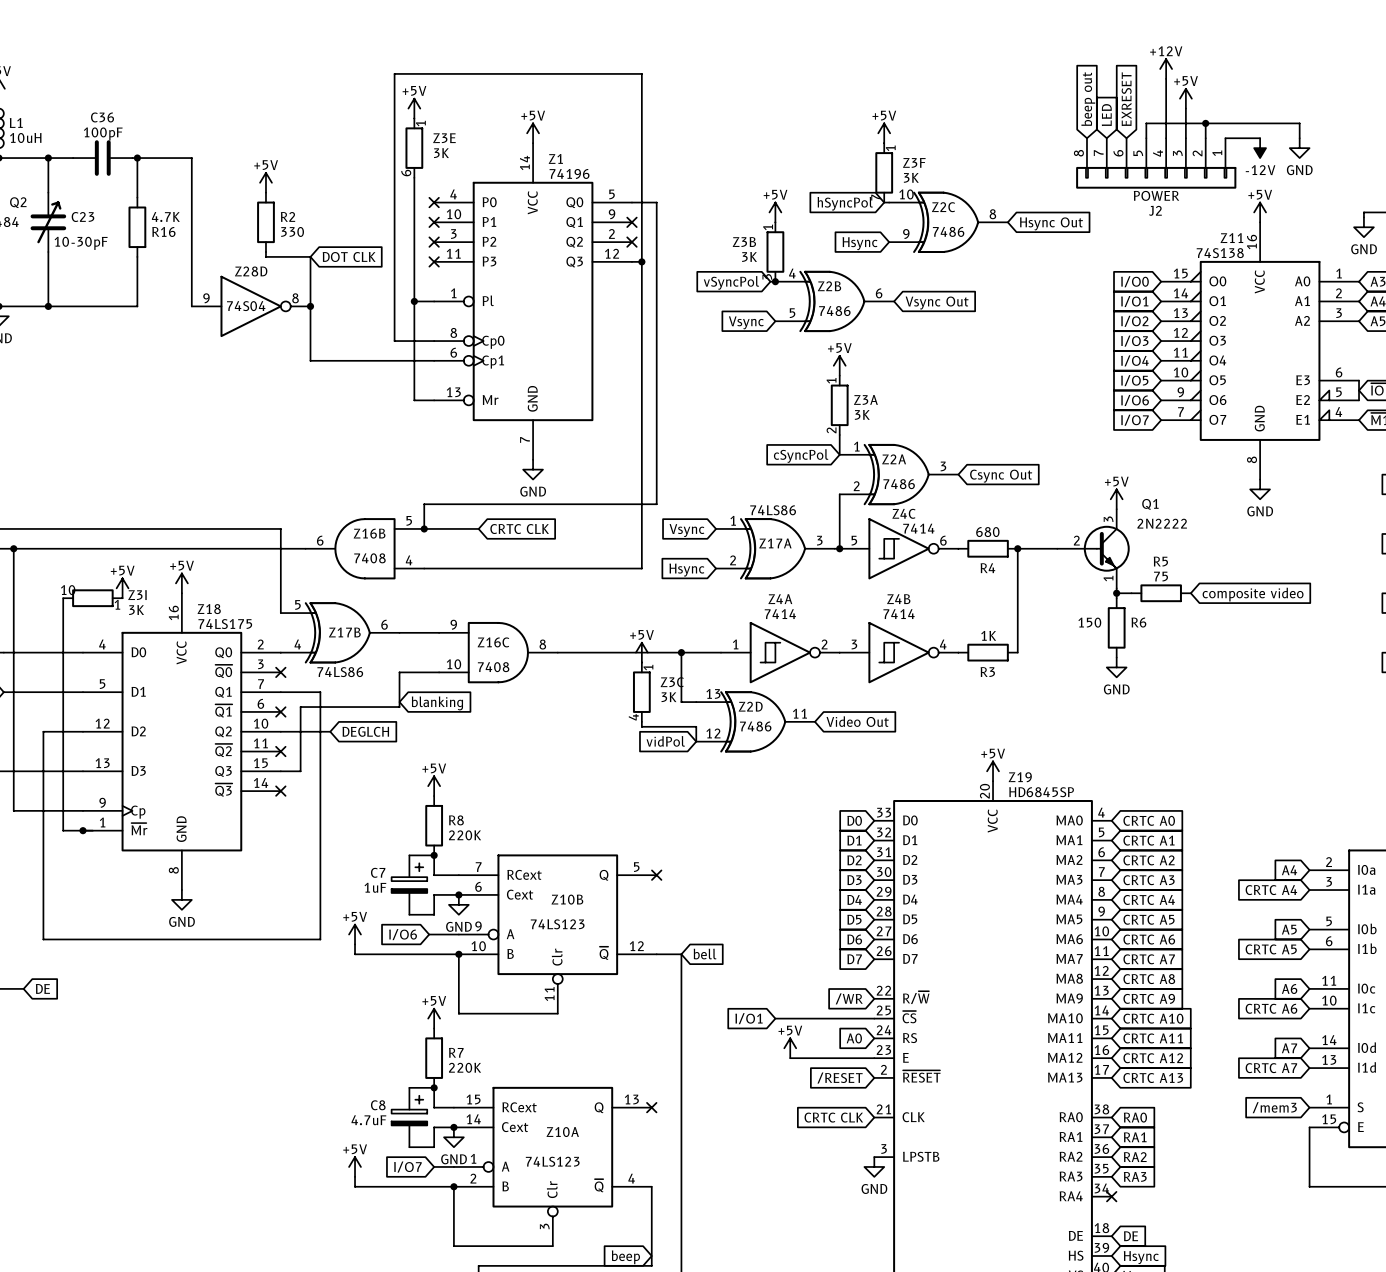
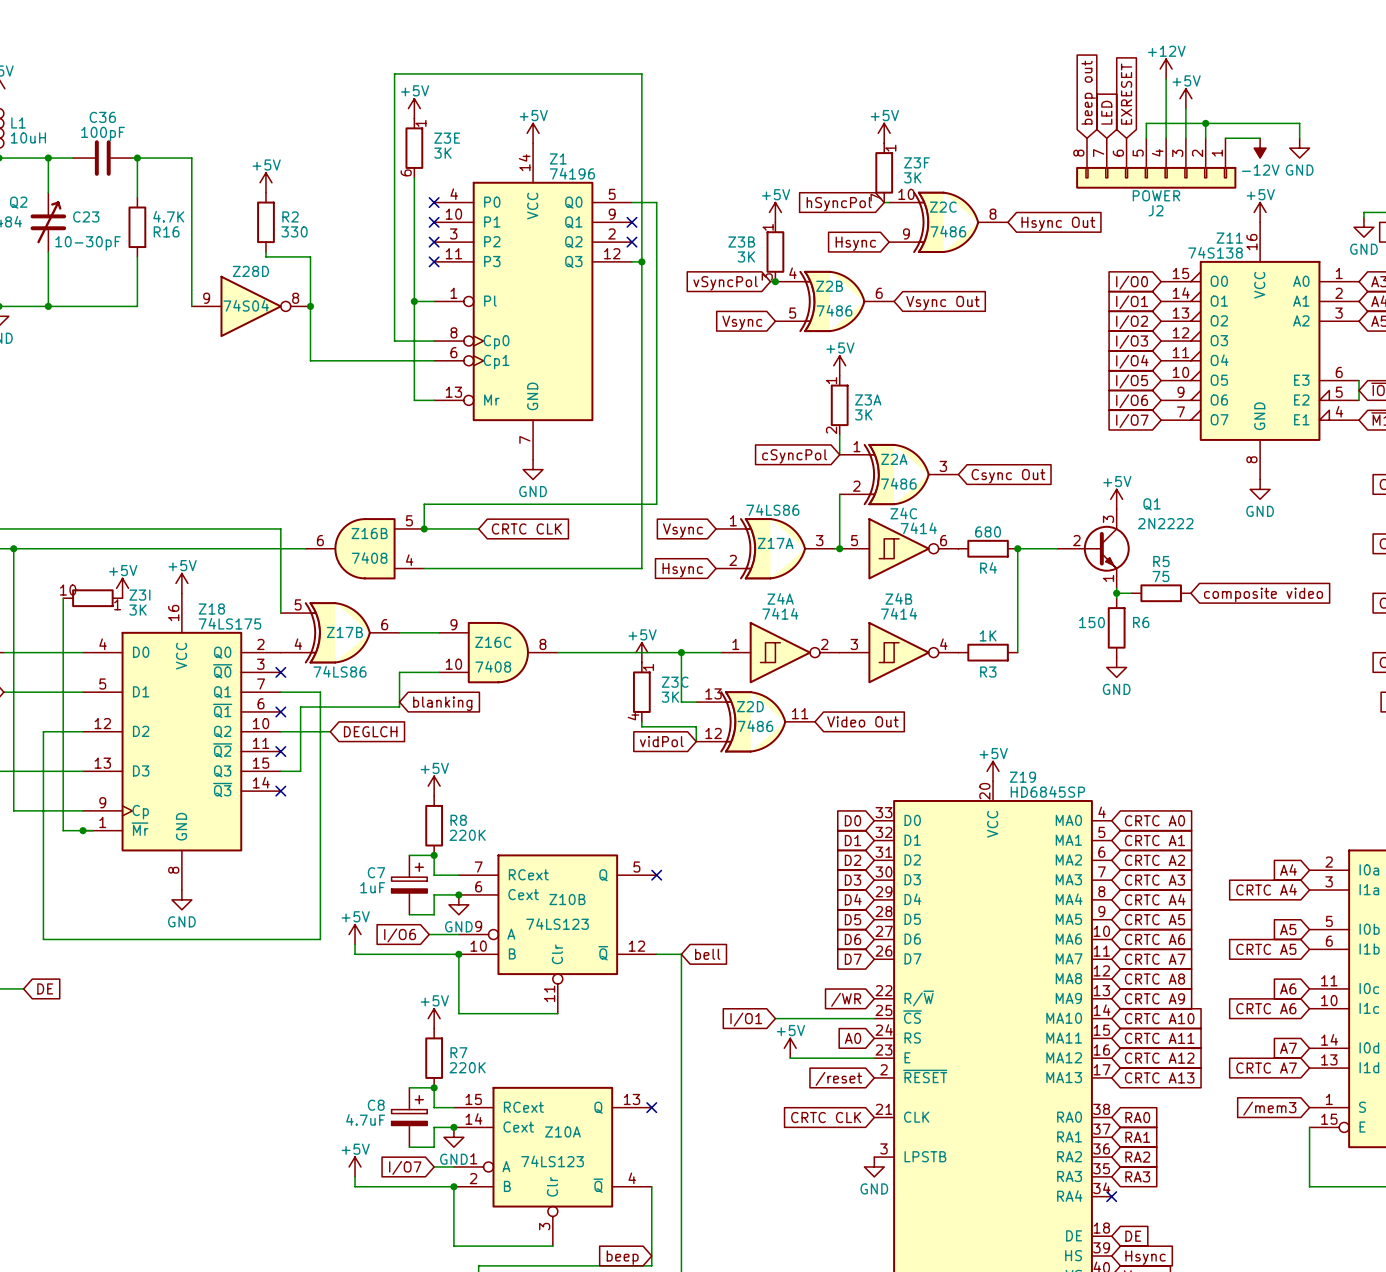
global label: DOT CLK (349, 257) -> none
global label: /RESET (840, 1078) -> /reset (838, 1078)

